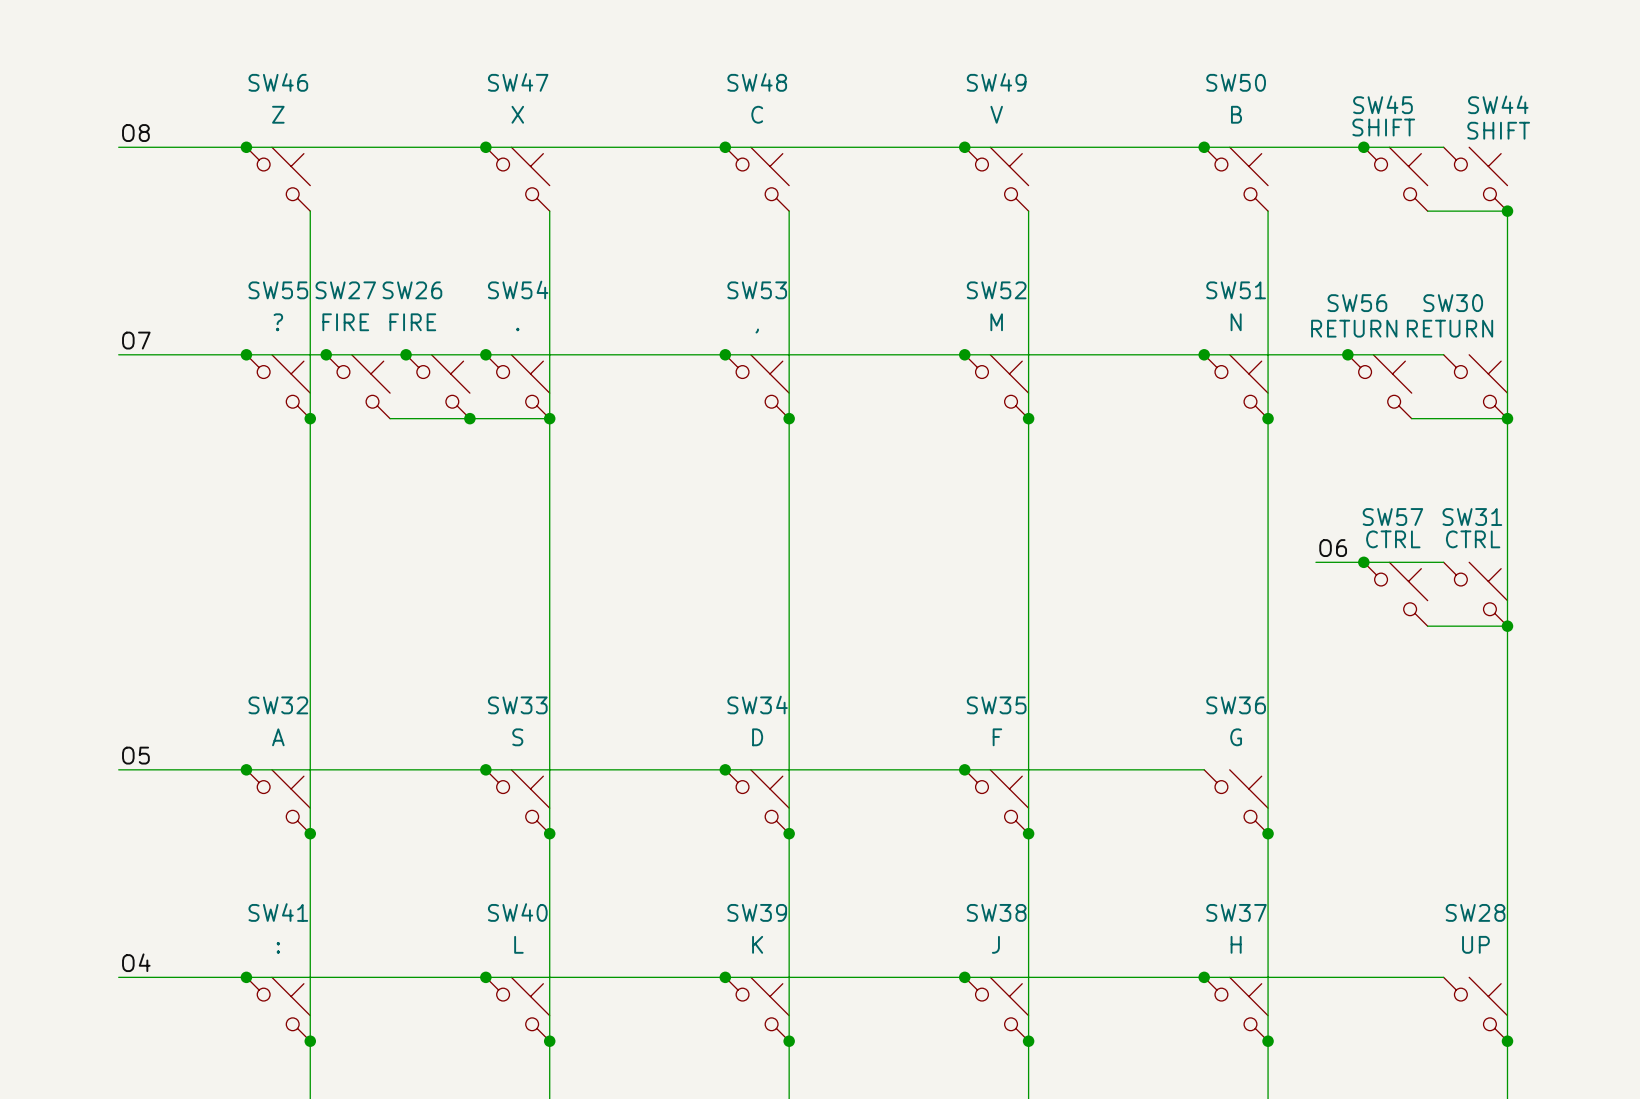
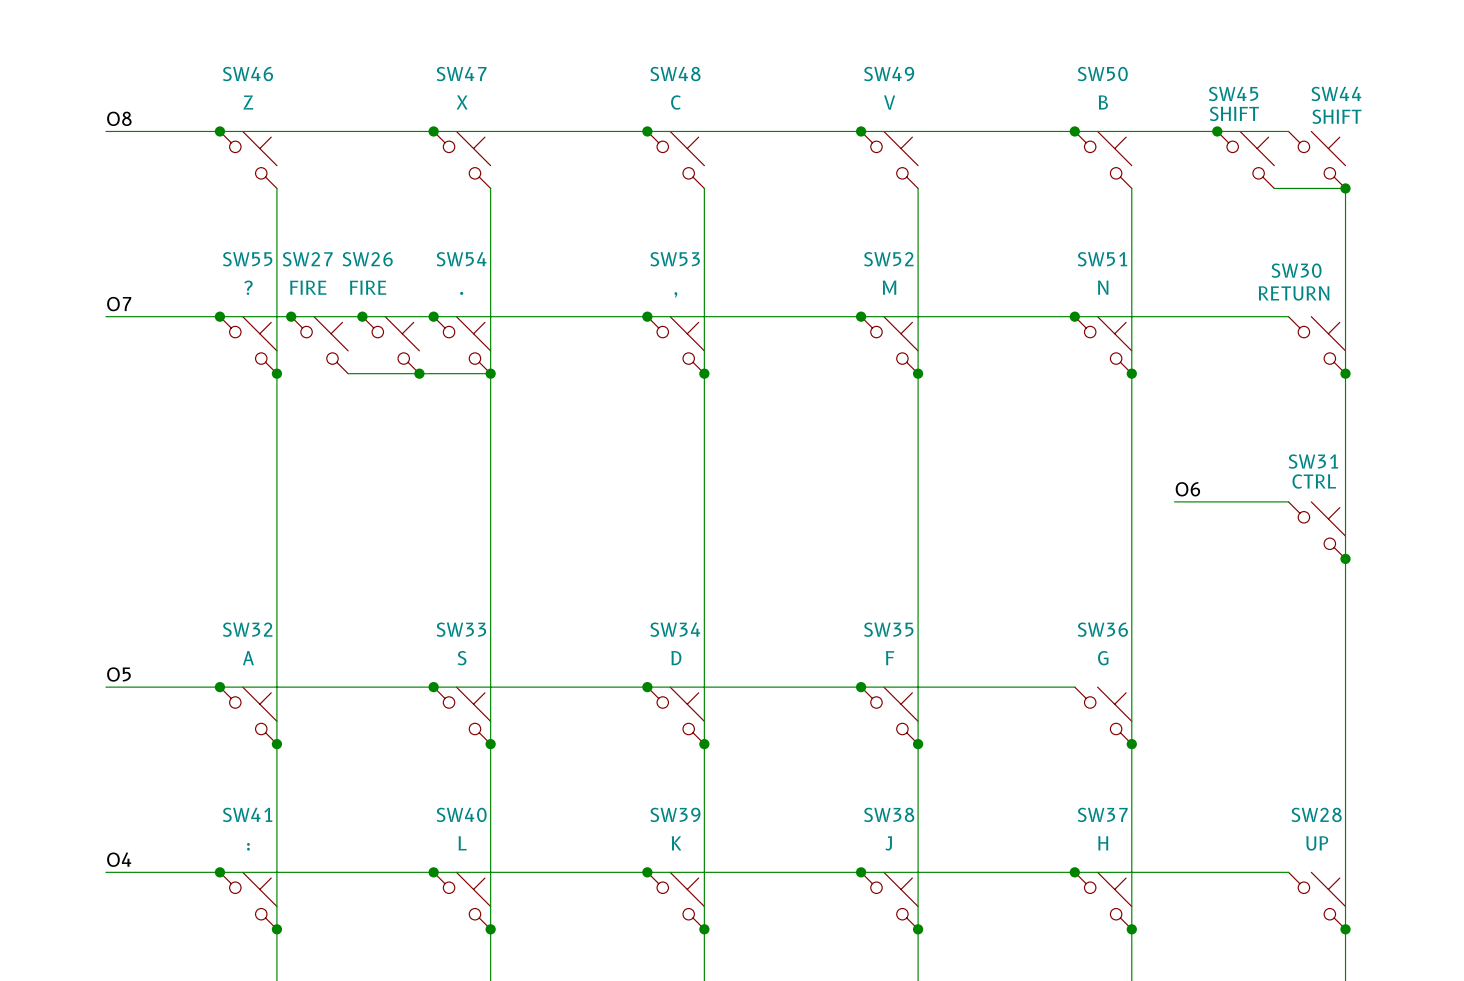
junction: (1347, 354) -> none
SW56: RETURN (1379, 386) -> none
wire: (1411, 418) (1507, 418) -> none
junction: (1363, 562) -> none
SW57: CTRL (1395, 594) -> none
wire: (1427, 626) (1507, 626) -> none

